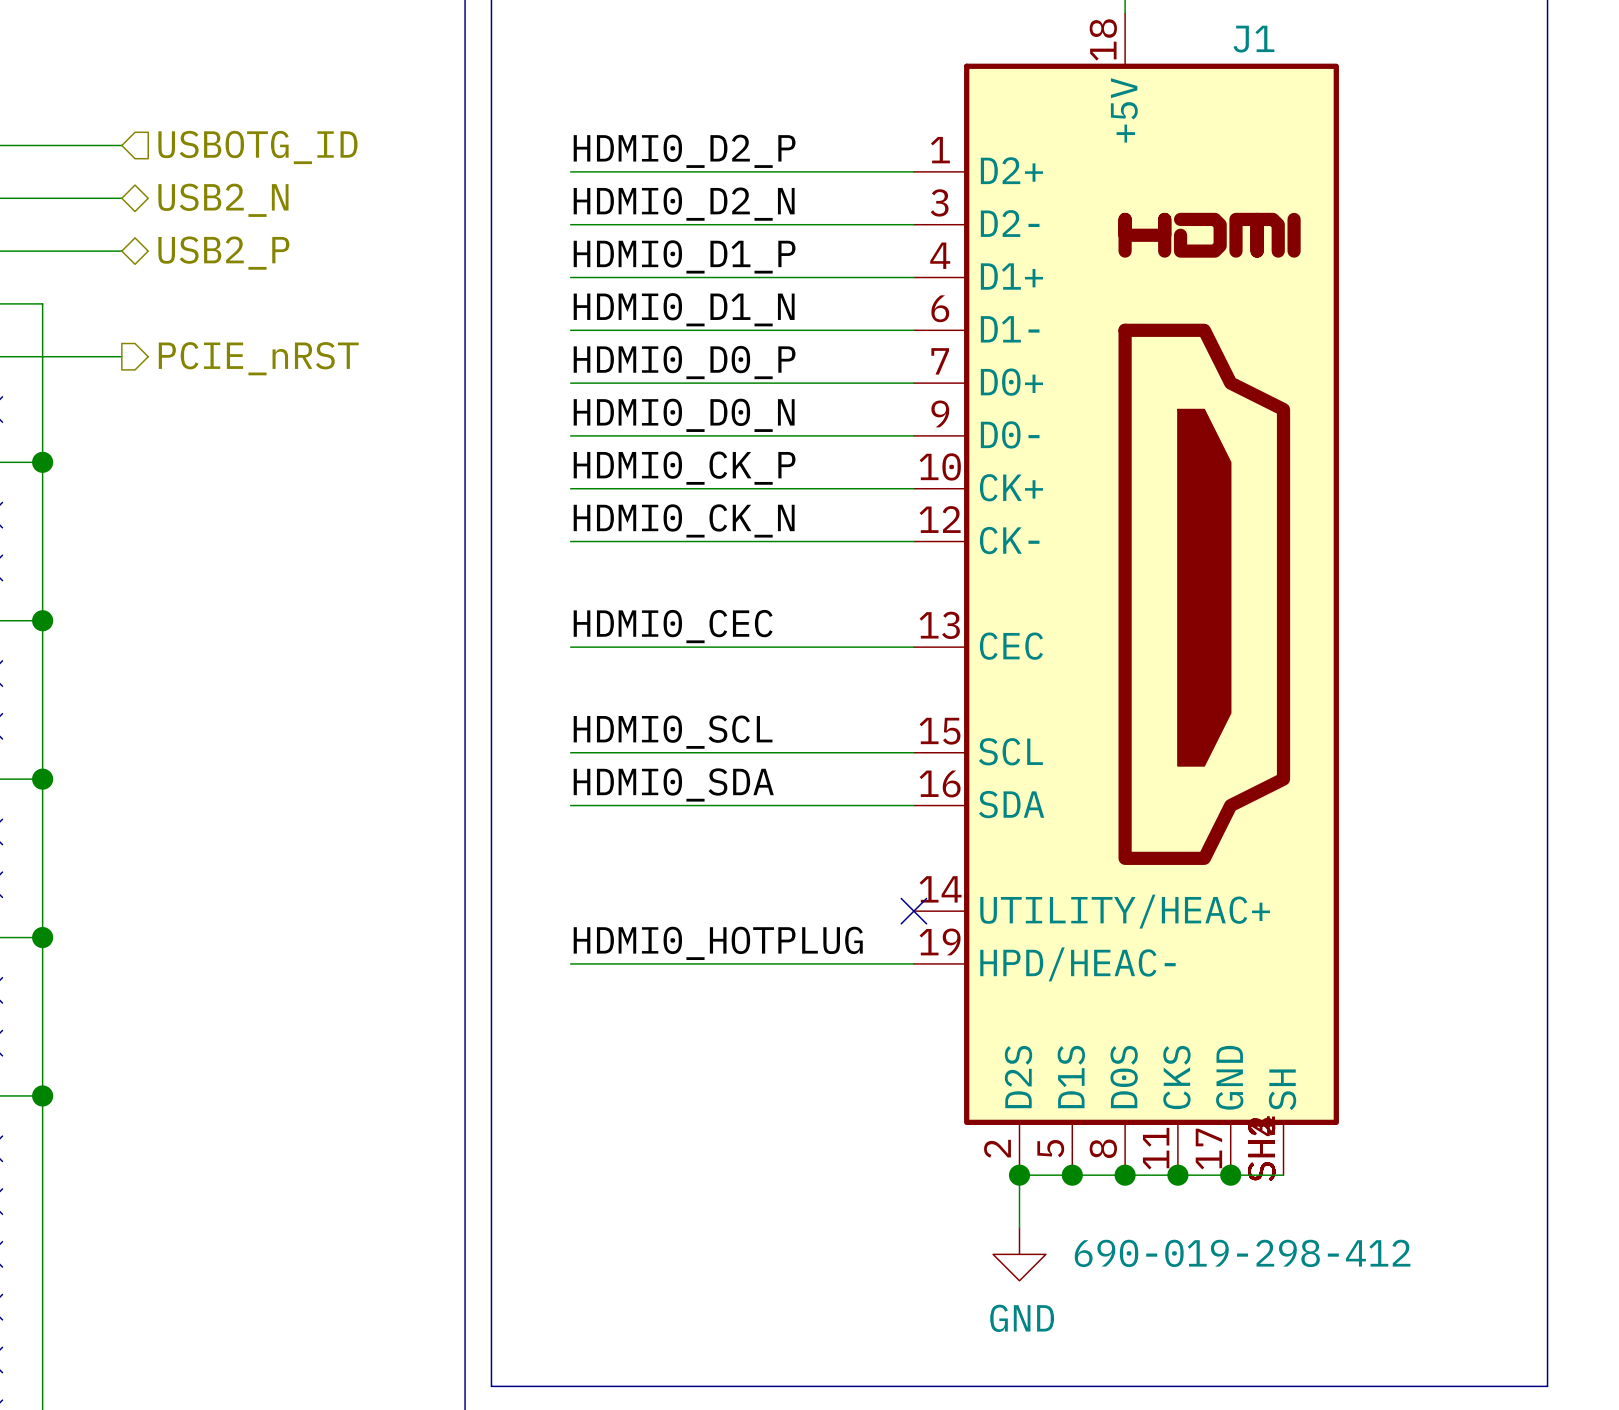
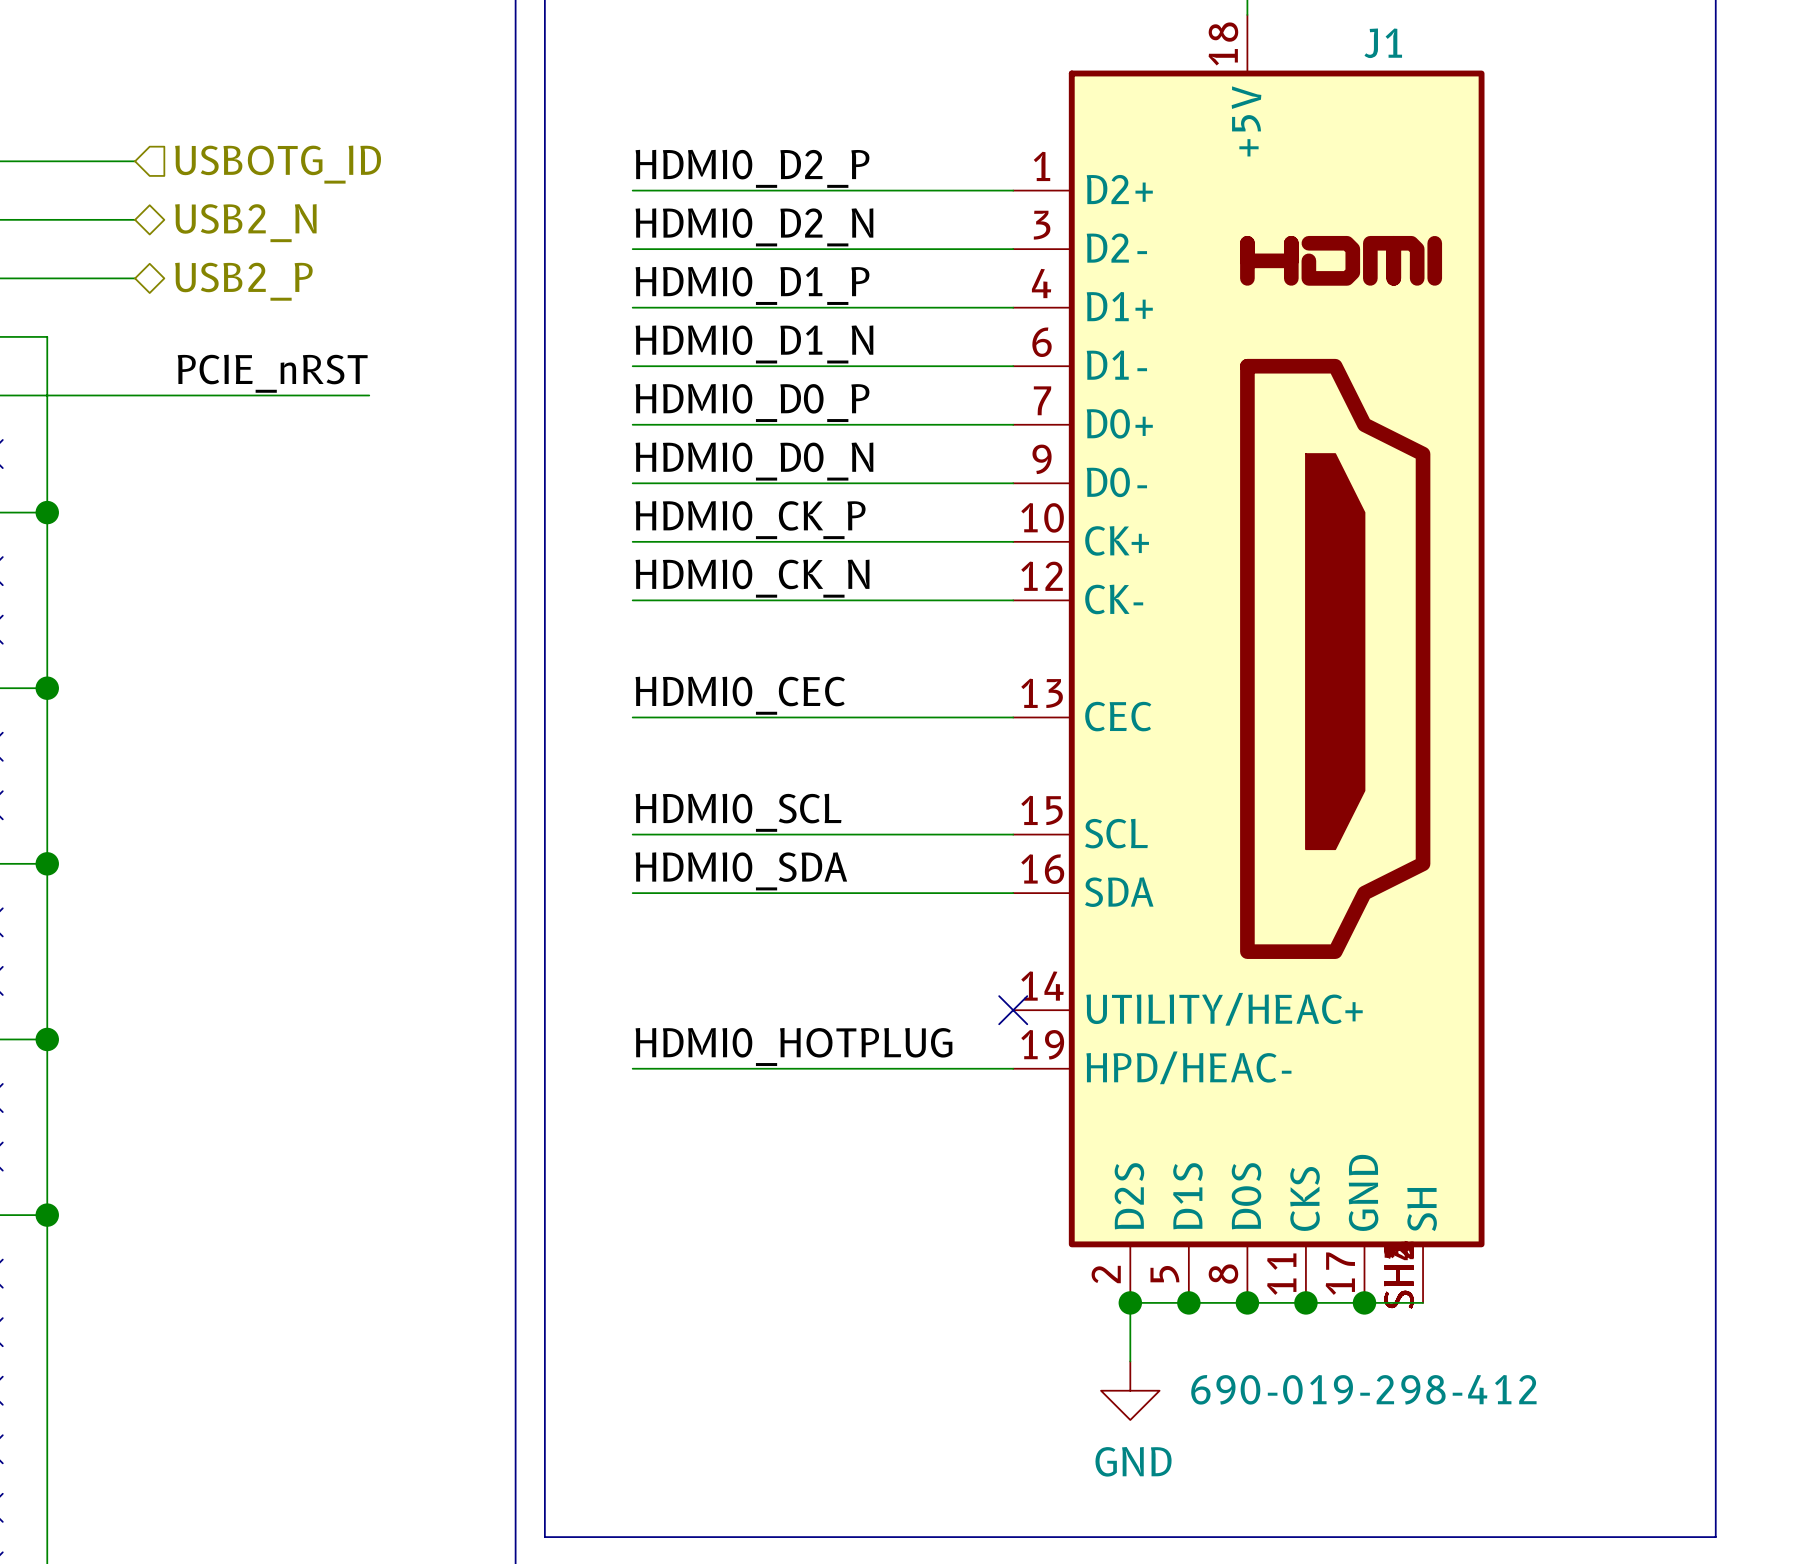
label: none -> PCIE_nRST (272, 373)
wire: none -> (135, 395) (369, 395)
hierarchical label: PCIE_nRST (258, 358) -> none

